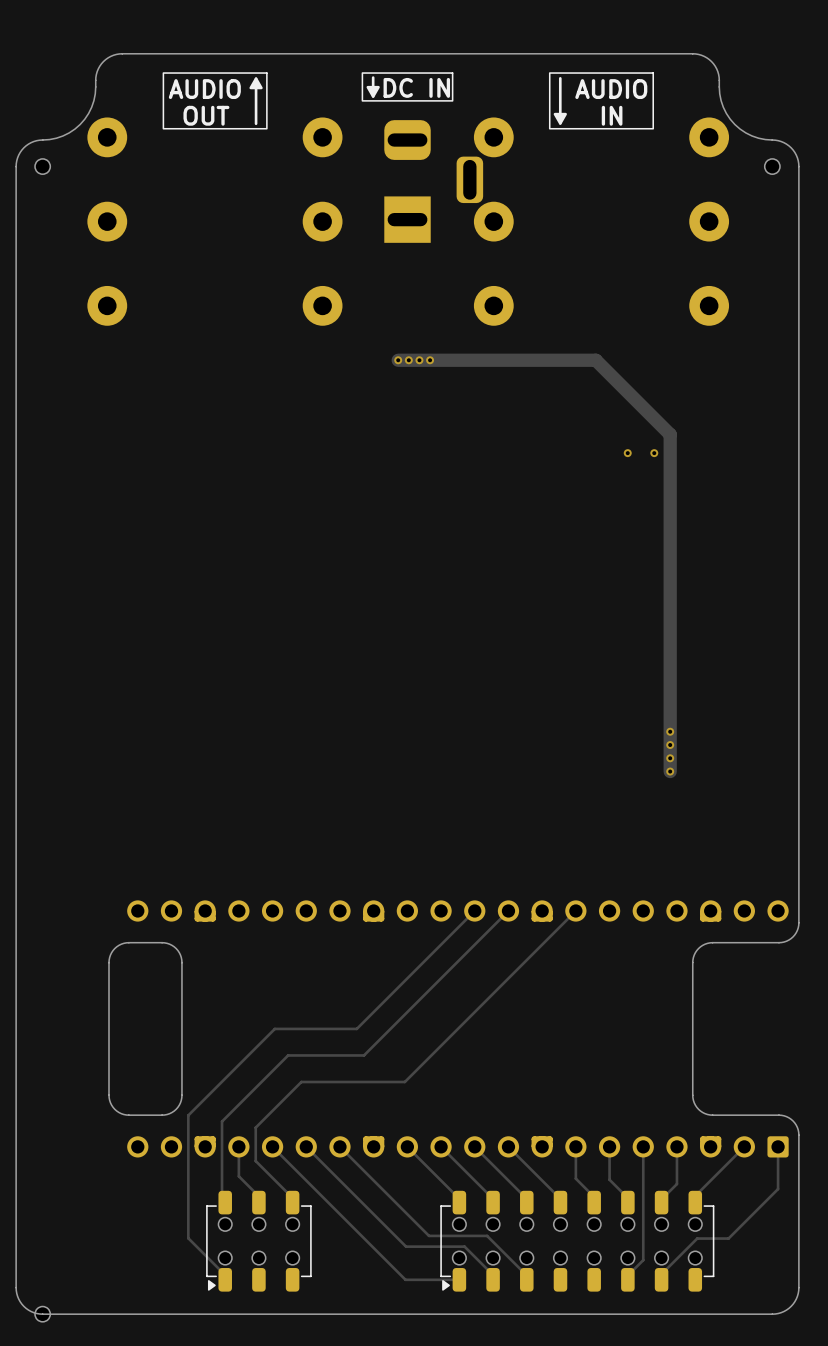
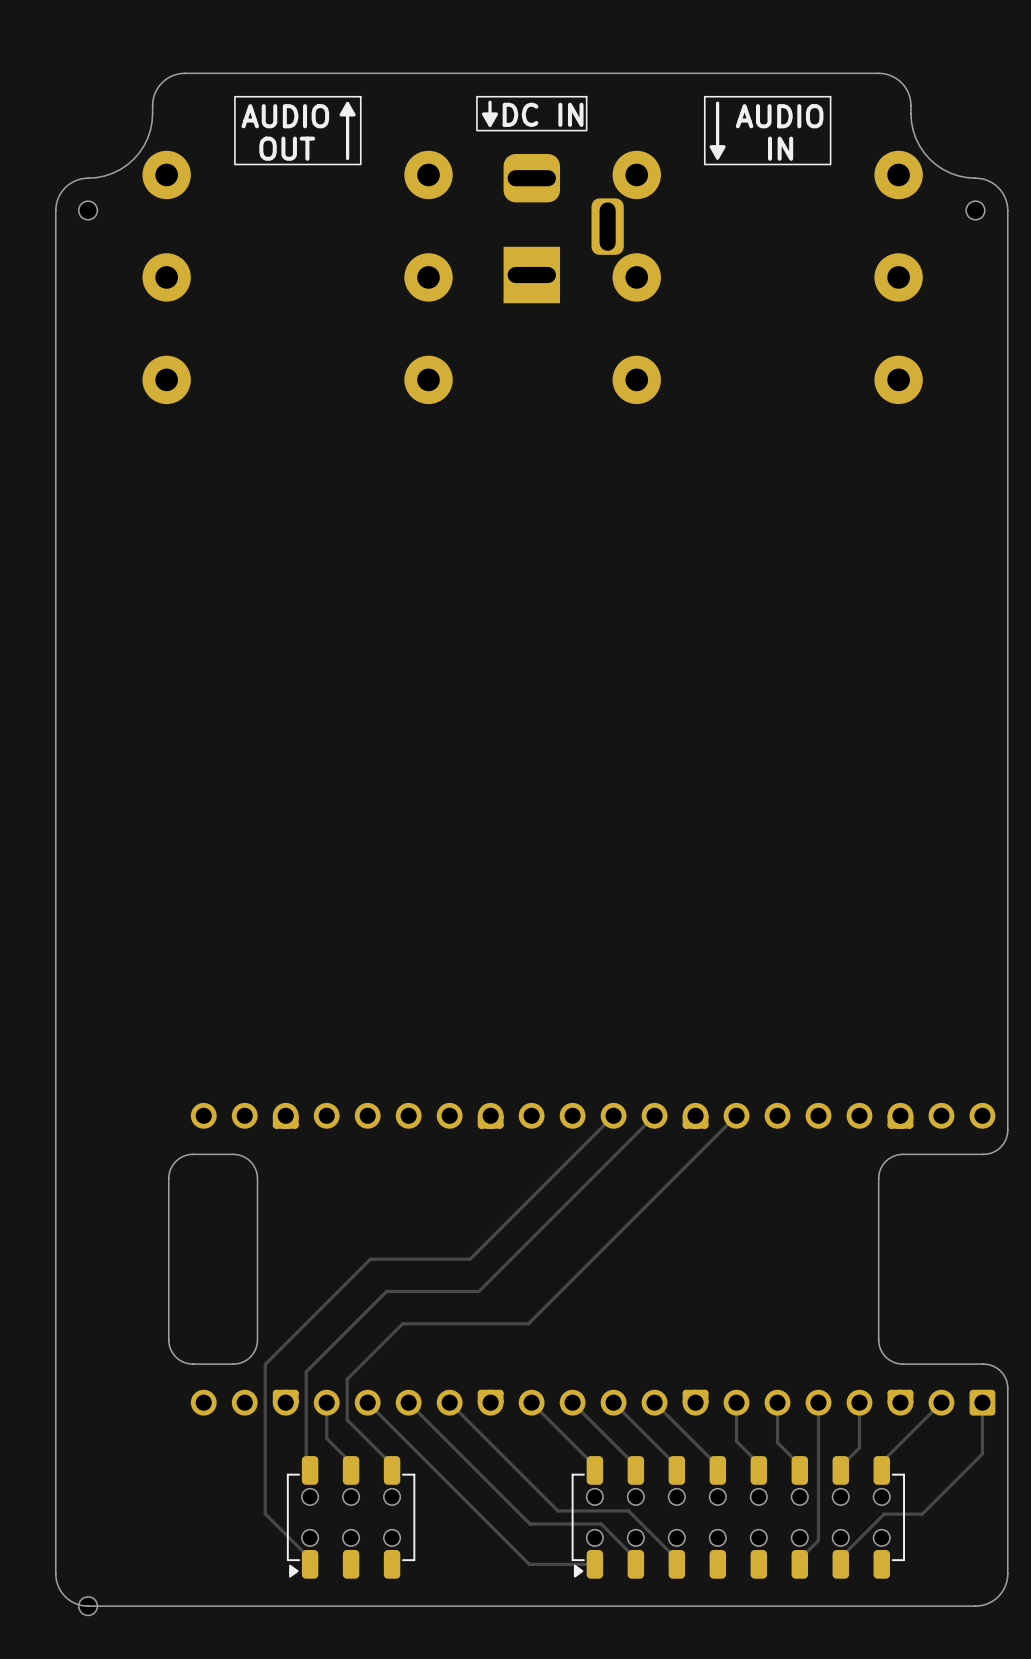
track: (398, 360) (595, 360) (670, 434) (670, 771) -> none
via: (398, 360) -> none
via: (408, 360) -> none
via: (419, 360) -> none
via: (430, 360) -> none
via: (627, 453) -> none
via: (654, 453) -> none
via: (670, 731) -> none
via: (670, 745) -> none
via: (670, 758) -> none
via: (670, 771) -> none

